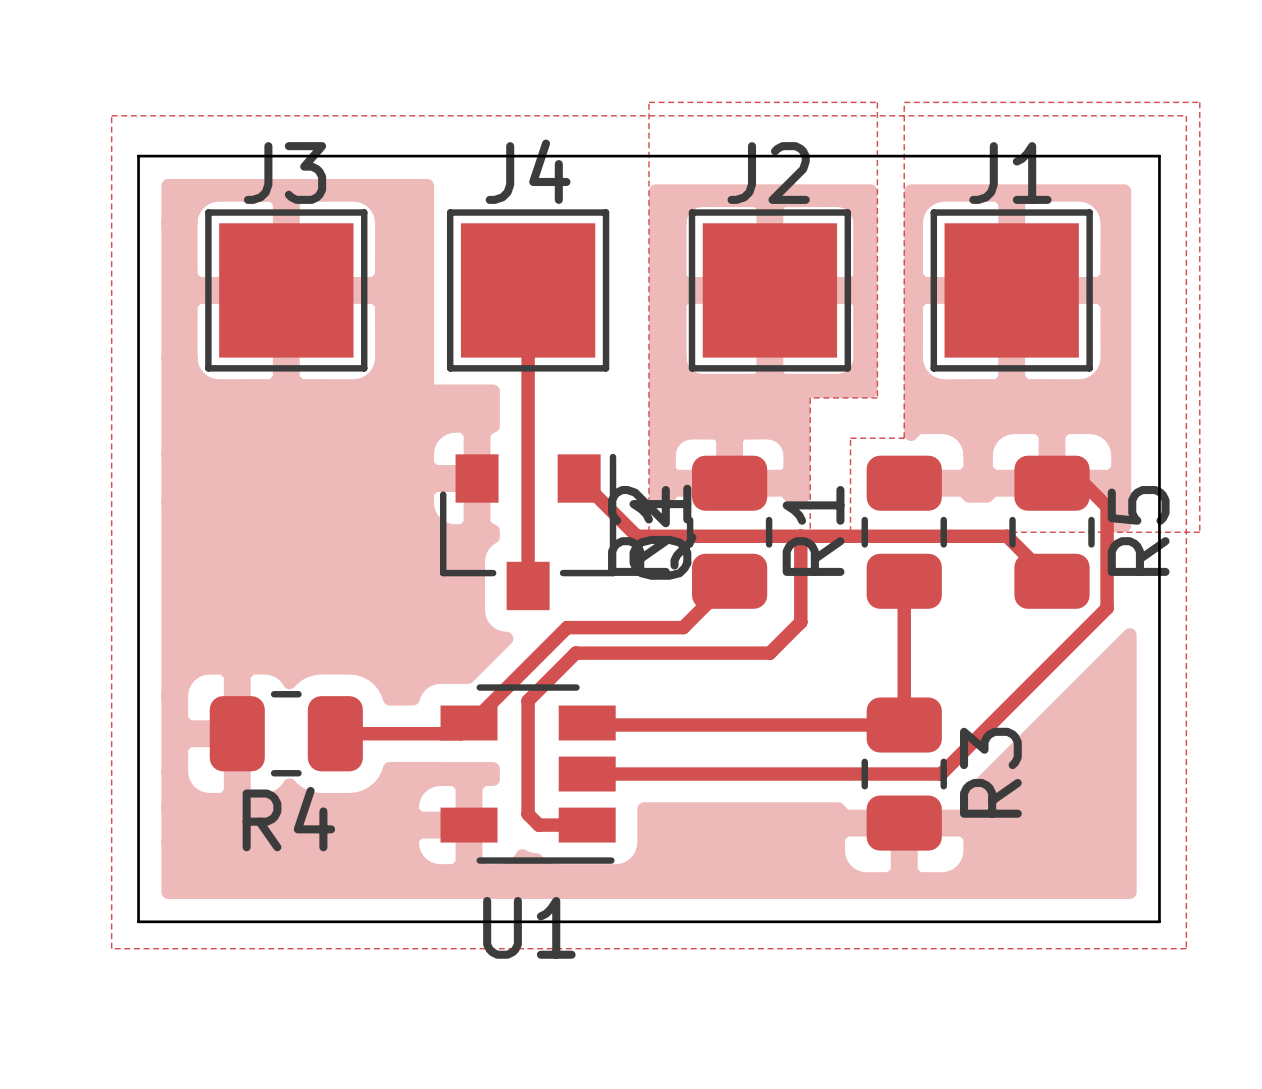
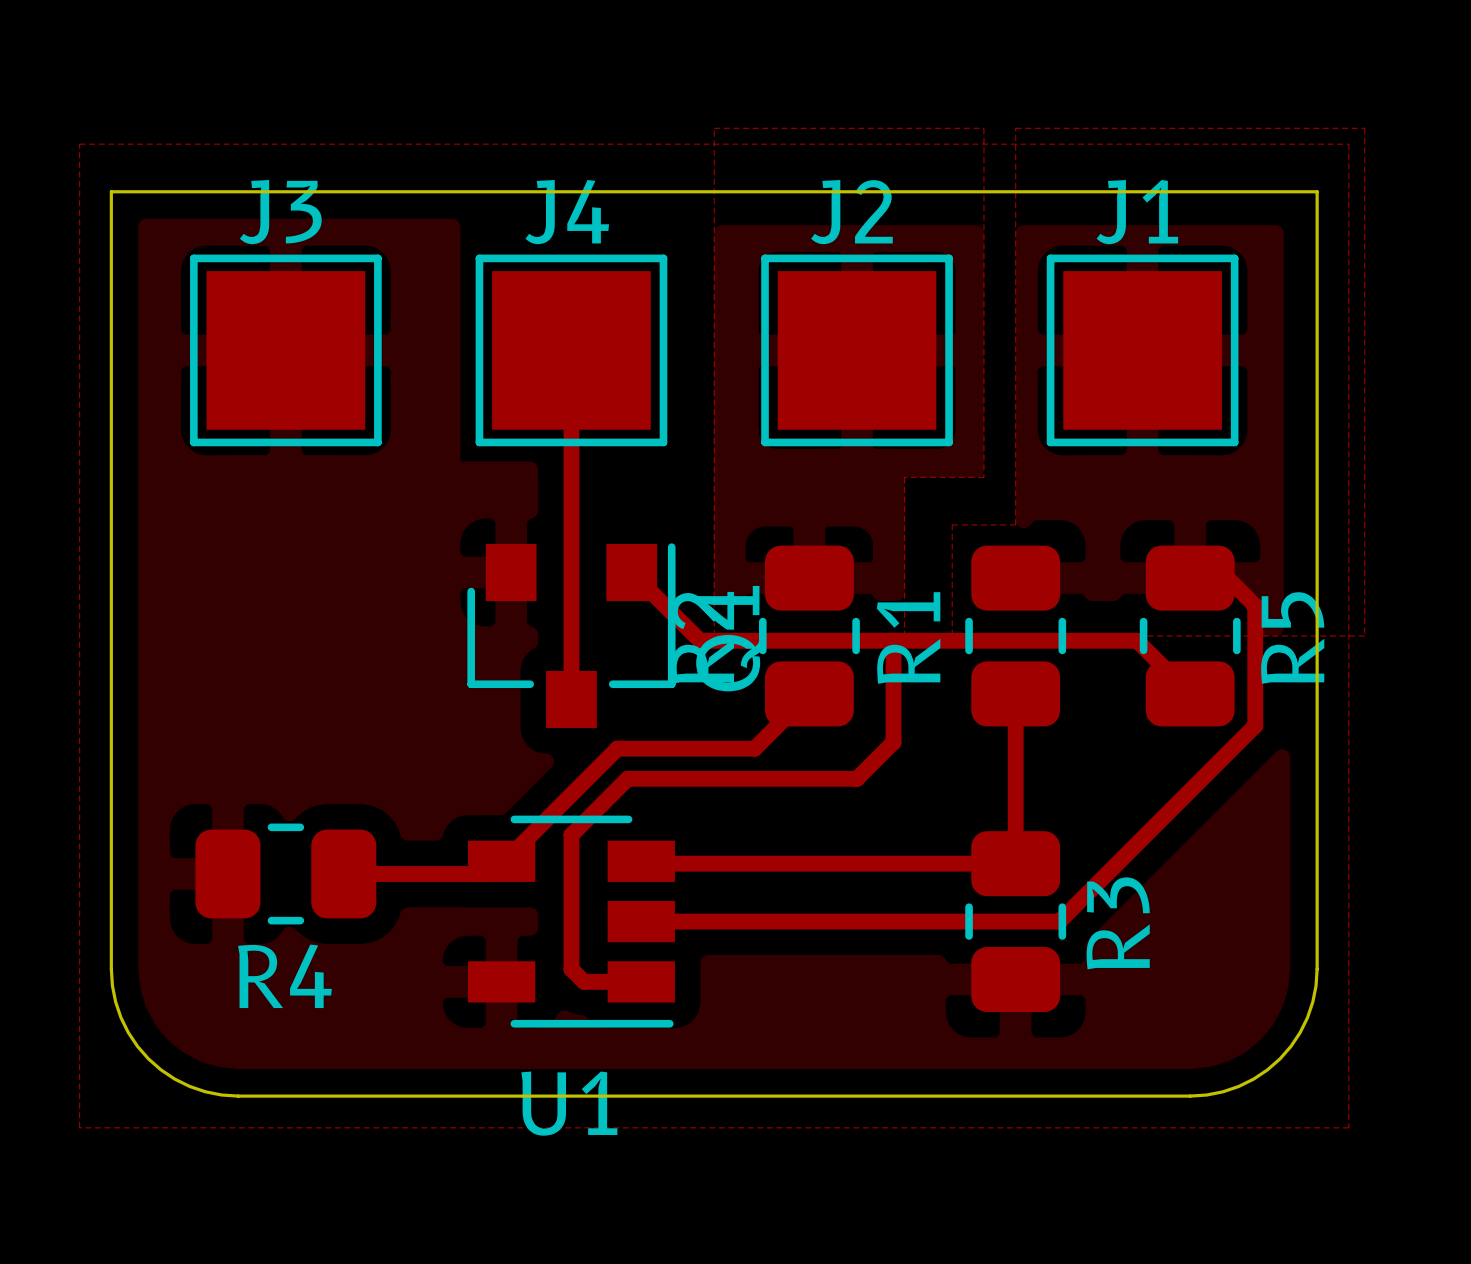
board edge: (138, 814) (138, 921) (246, 921) -> (111, 969) (115, 1002) (121, 1017) (128, 1032) (148, 1058) (174, 1079) (189, 1086) (205, 1091) (238, 1096)
board edge: (1159, 814) (1159, 921) (1052, 921) -> (1317, 969) (1316, 985) (1307, 1017) (1290, 1046) (1279, 1058) (1253, 1079) (1238, 1086) (1223, 1091) (1190, 1096)

